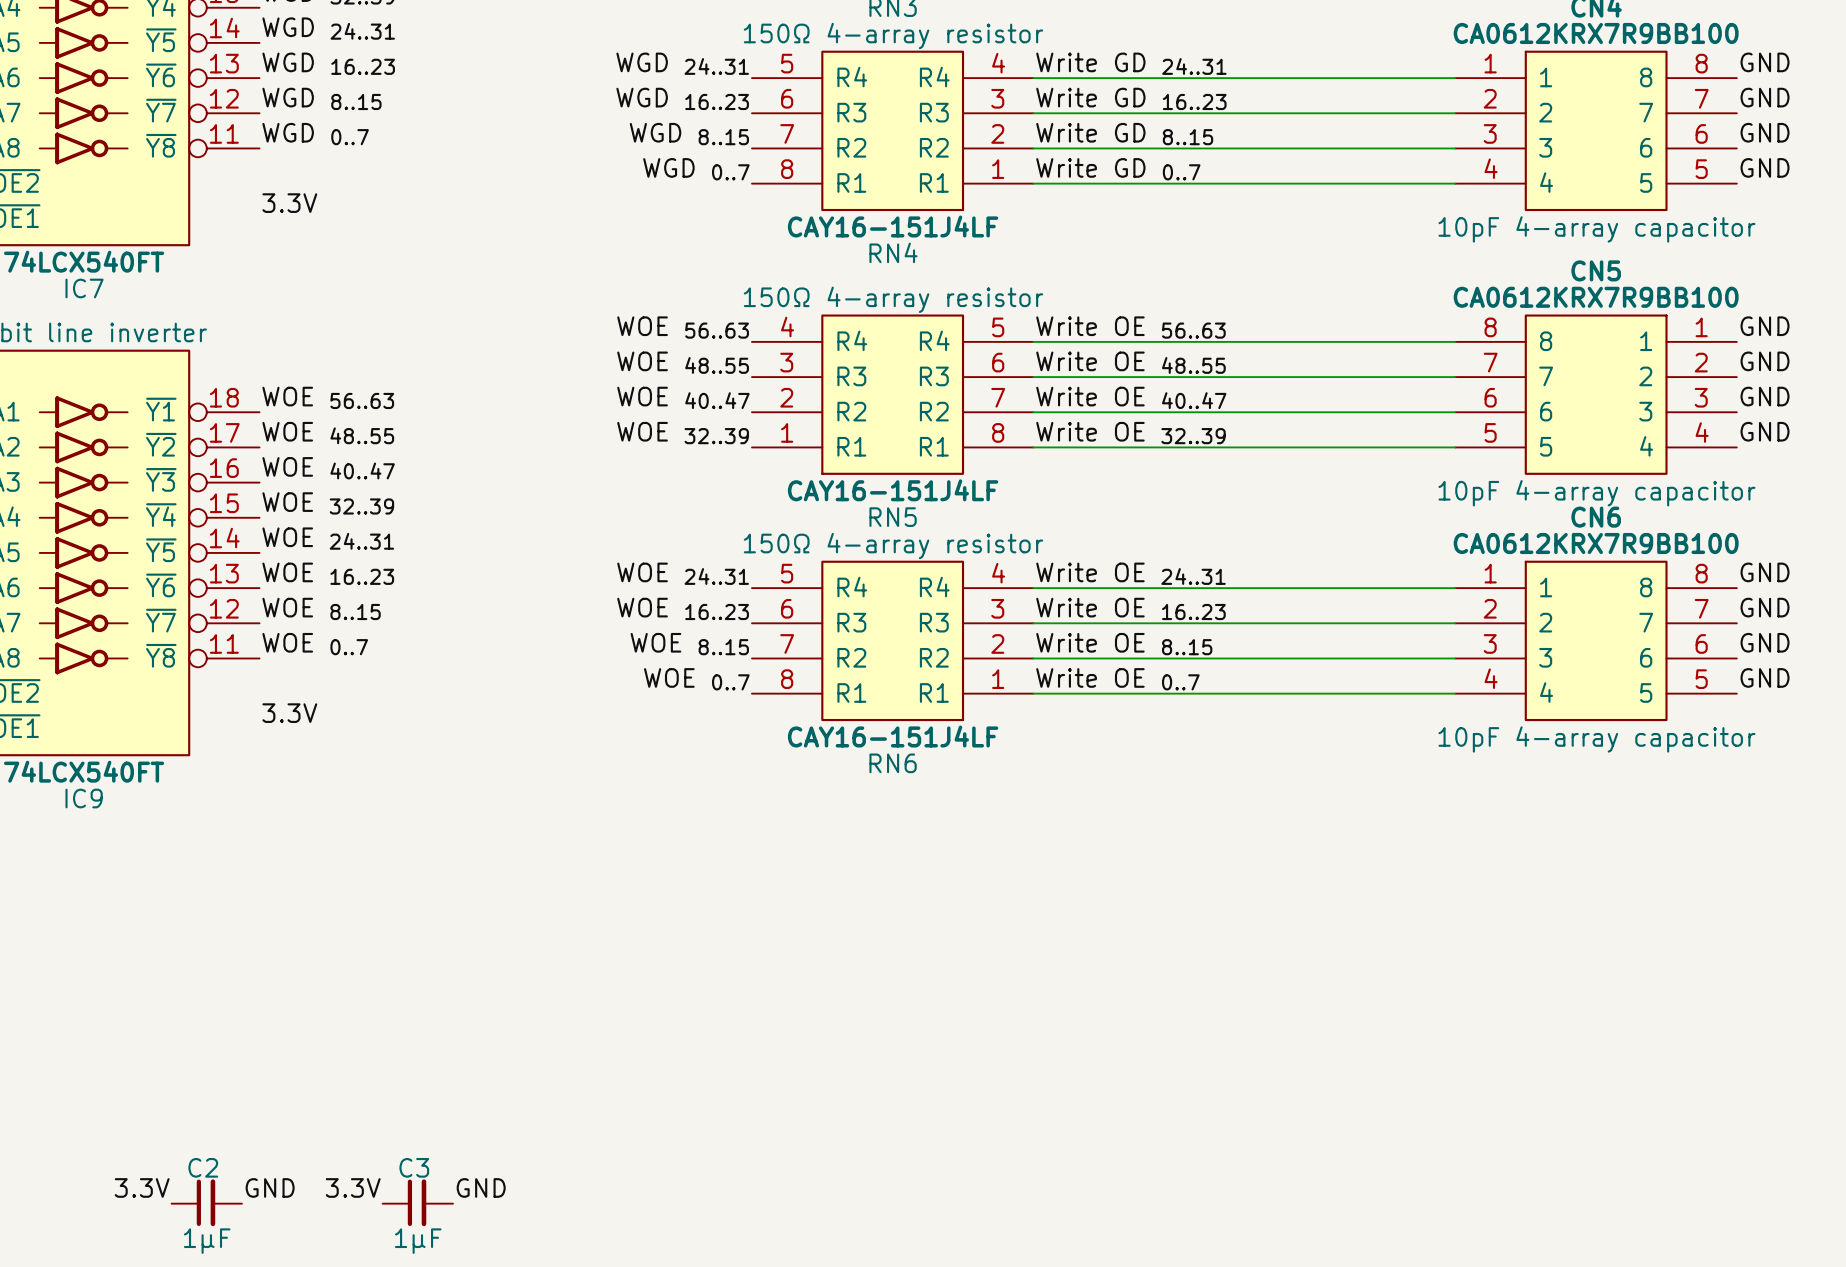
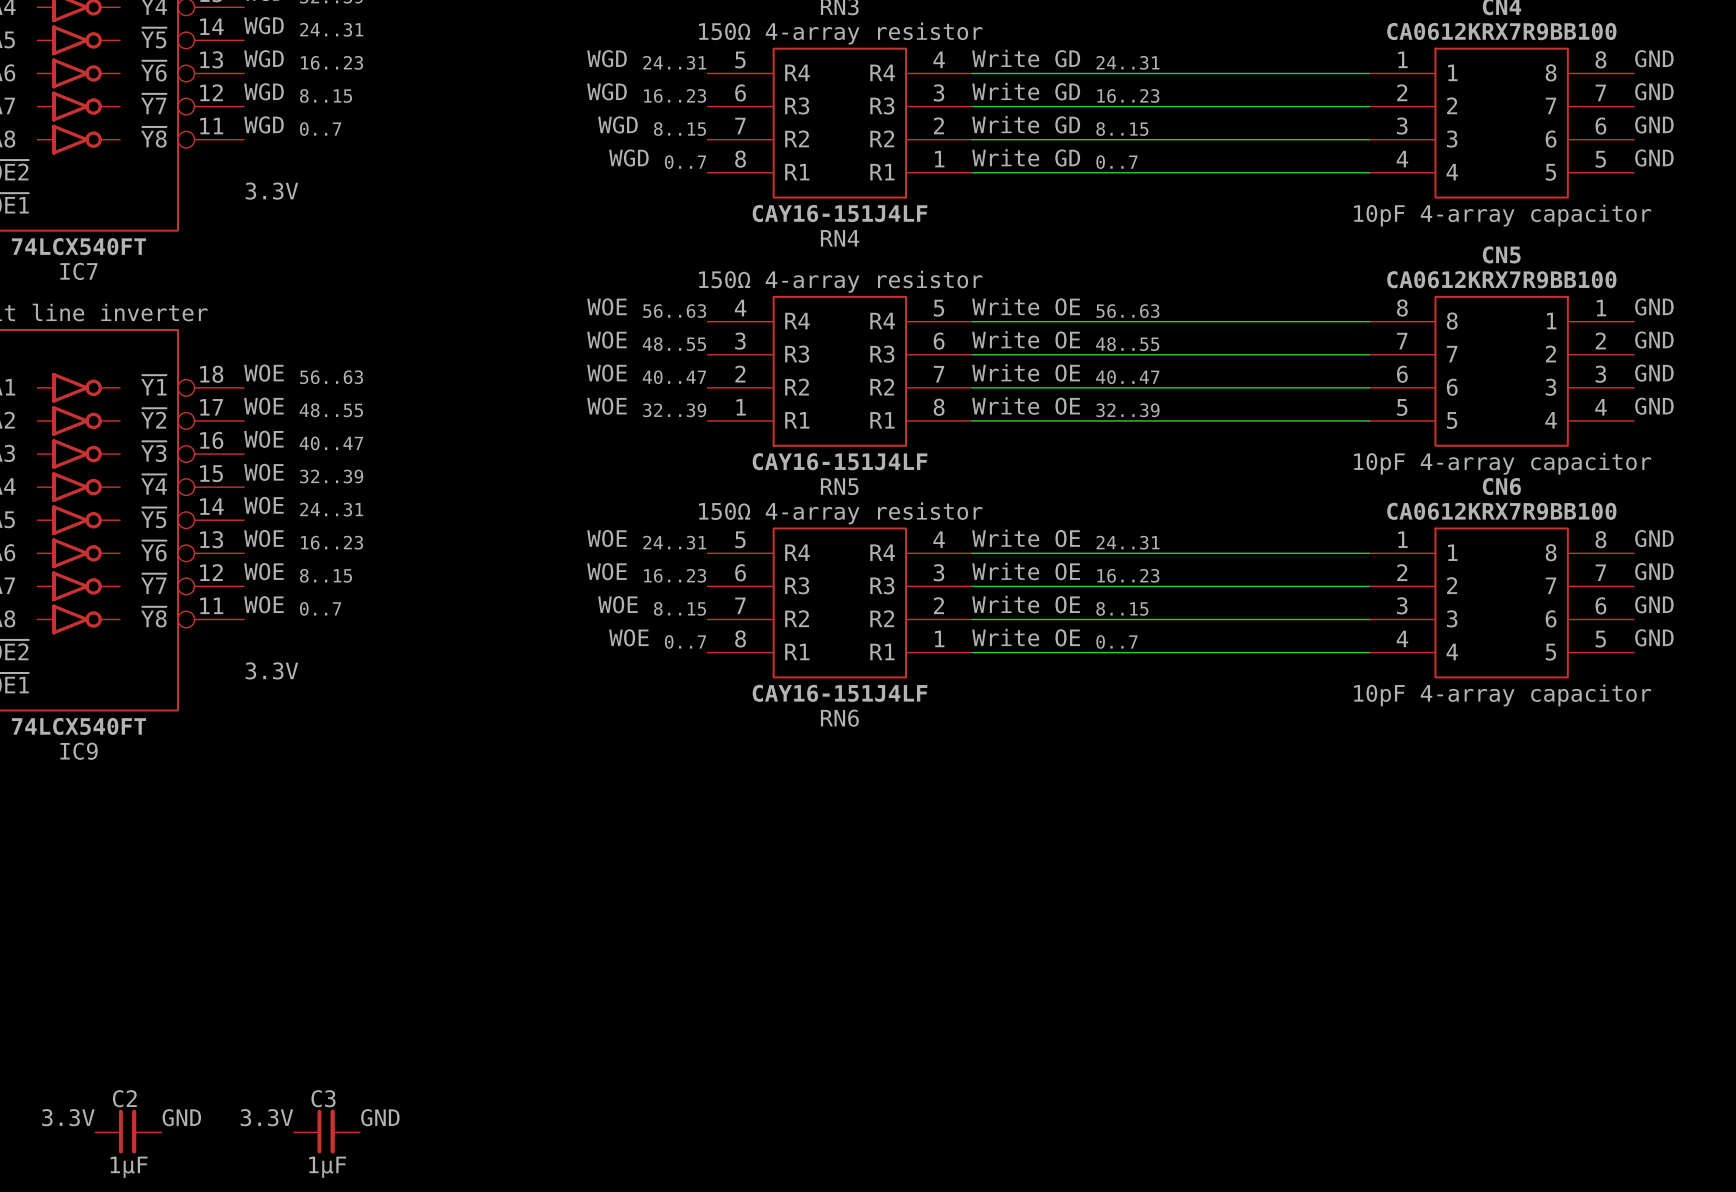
label: none -> 3.3V (68, 1117)
label: 3.3V (142, 1187) -> GND (181, 1117)
label: GND (270, 1187) -> none
label: none -> 3.3V (266, 1117)
label: 3.3V (353, 1187) -> GND (380, 1117)
label: GND (481, 1187) -> none
C2 position: (206, 1202) -> (128, 1131)
C3 position: (417, 1202) -> (326, 1131)

